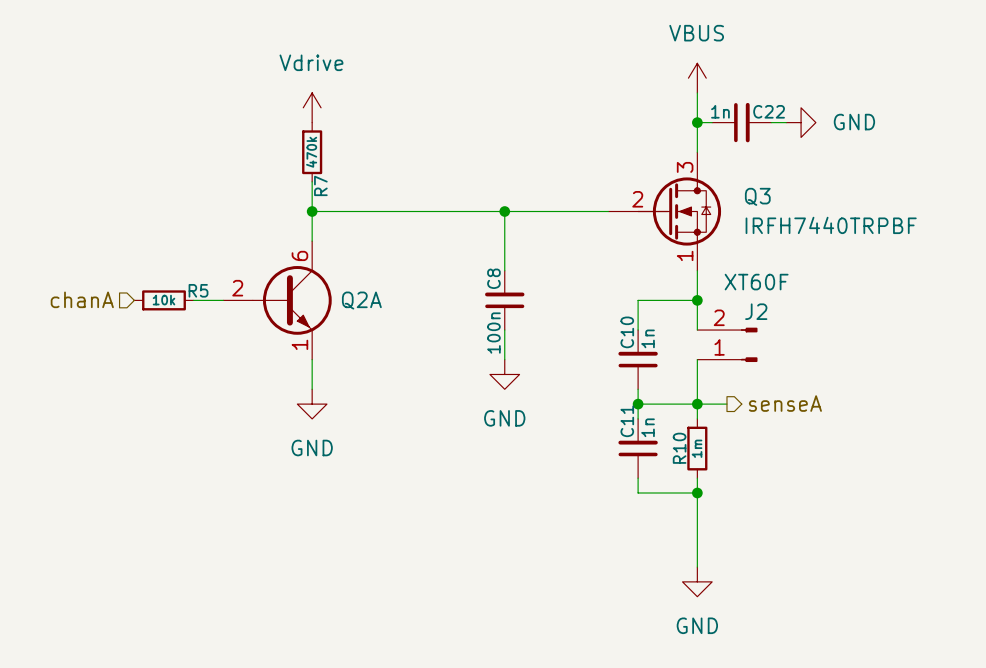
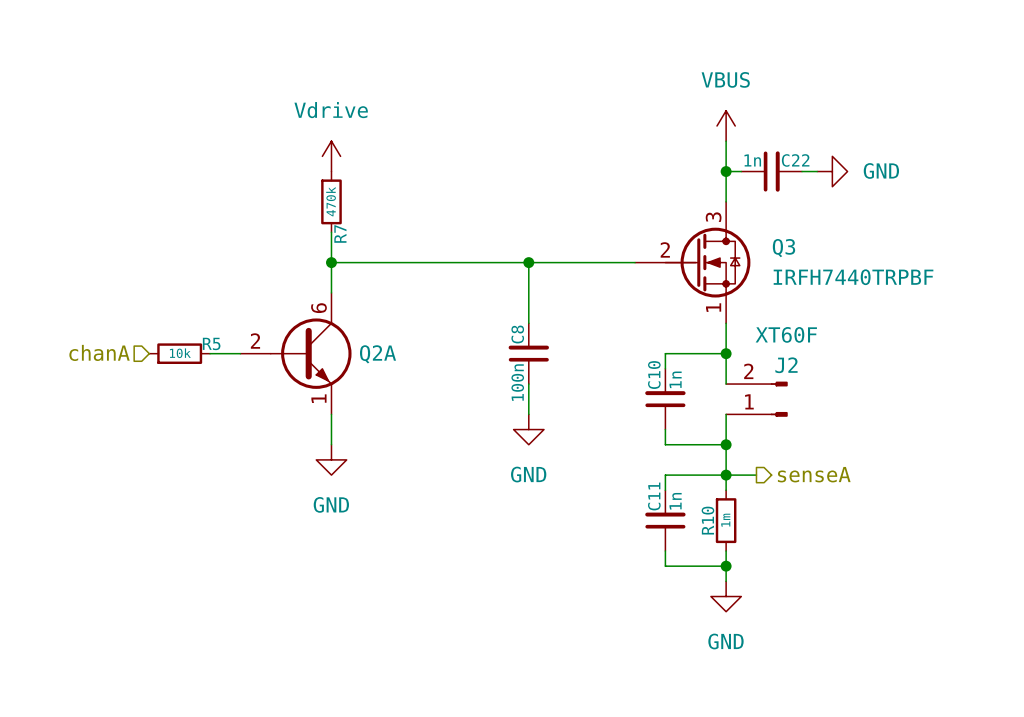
C10 position: (638, 359) -> (665, 399)
wire: none -> (665, 429) (665, 444) (726, 444)
wire: (638, 389) (638, 418) -> none
junction: none -> (726, 444)
hierarchical label position: senseA (785, 403) -> senseA (814, 474)
wire: (638, 404) (726, 404) -> none
junction: (638, 404) -> none
junction: (697, 404) -> none
junction: none -> (726, 475)
wire: none -> (756, 475) (665, 475) (665, 490)
C11 position: (638, 448) -> (665, 520)
R10 position: (697, 448) -> (726, 520)
wire: (638, 478) (638, 492) (697, 492) (697, 478) -> none
wire: none -> (665, 550) (665, 566) (726, 566)
junction position: (697, 492) -> (726, 566)
wire: (697, 522) (697, 567) -> none
power symbol position: GND (697, 581) -> GND (726, 596)

